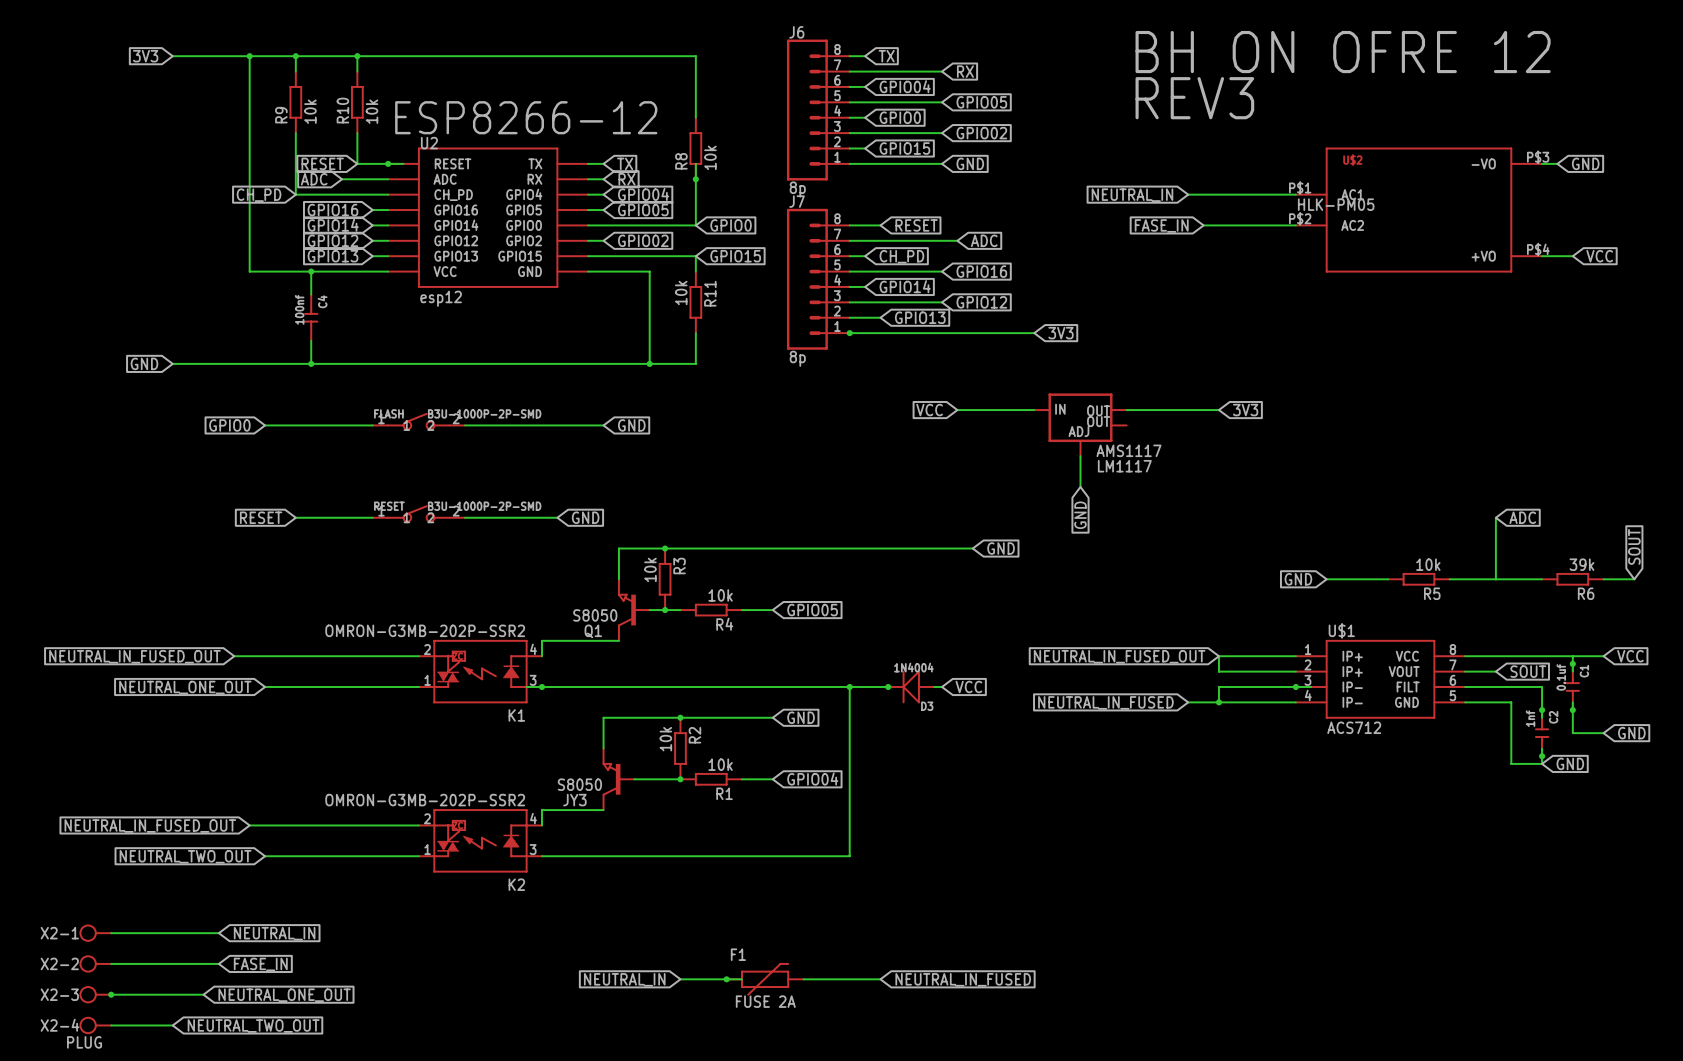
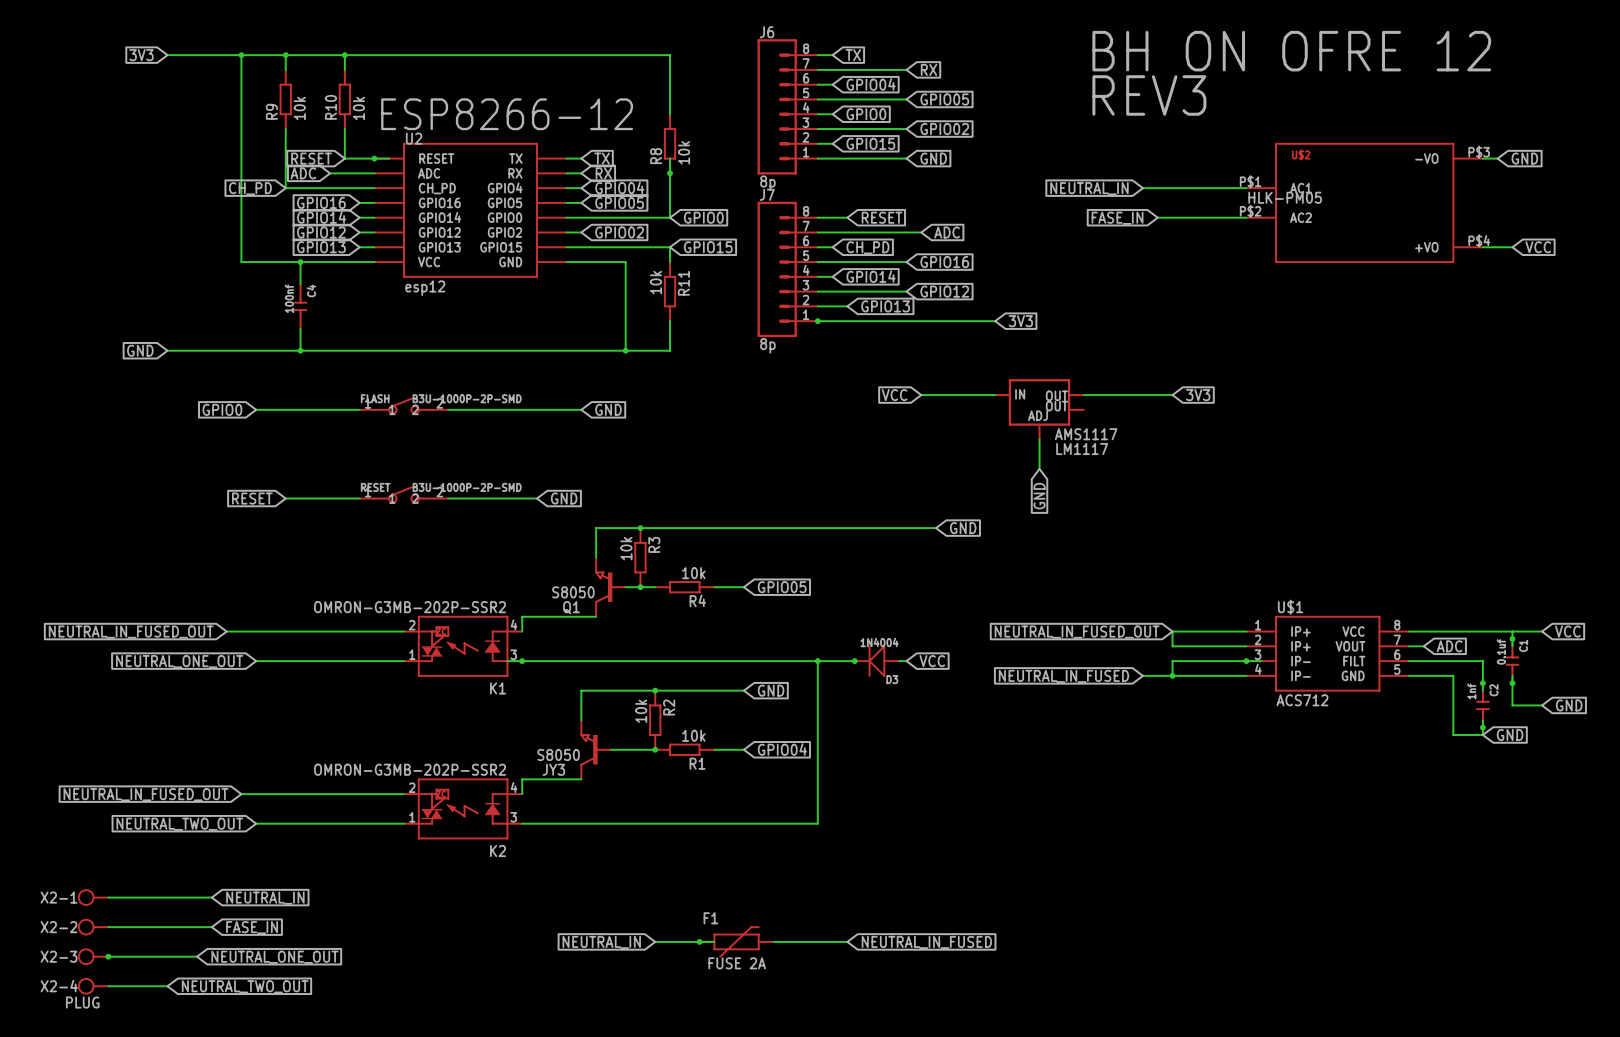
wire: (1495, 517) (1495, 579) -> none
global label: ADC (1522, 517) -> none
global label: SOUT (1634, 546) -> none
global label: GND (1298, 579) -> none
wire: (1326, 579) (1388, 579) -> none
R5: 10k (1418, 579) -> none
wire: (1449, 579) (1542, 579) -> none
R6: 39k (1572, 579) -> none
wire: (1603, 579) (1634, 579) -> none
wire: (1480, 671) (1495, 671) -> none
global label: none -> ADC (1449, 646)
global label: SOUT (1528, 671) -> none

